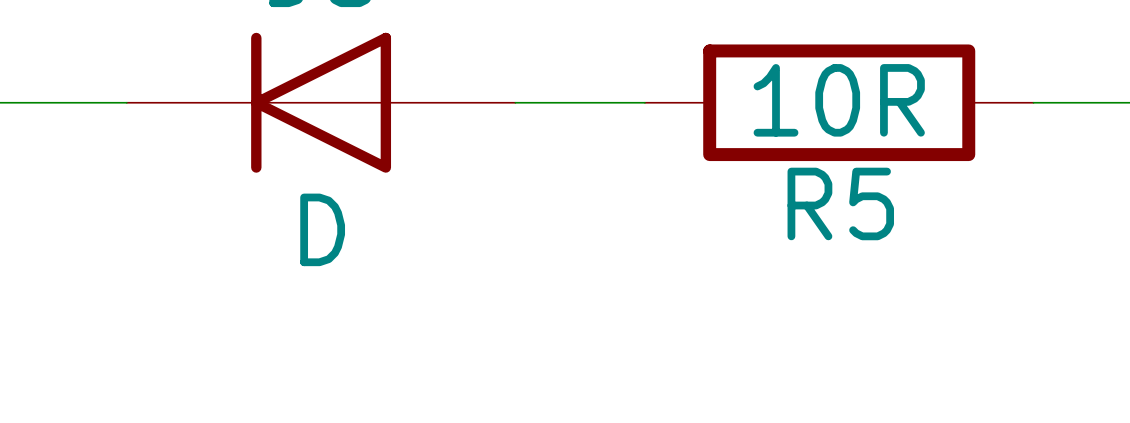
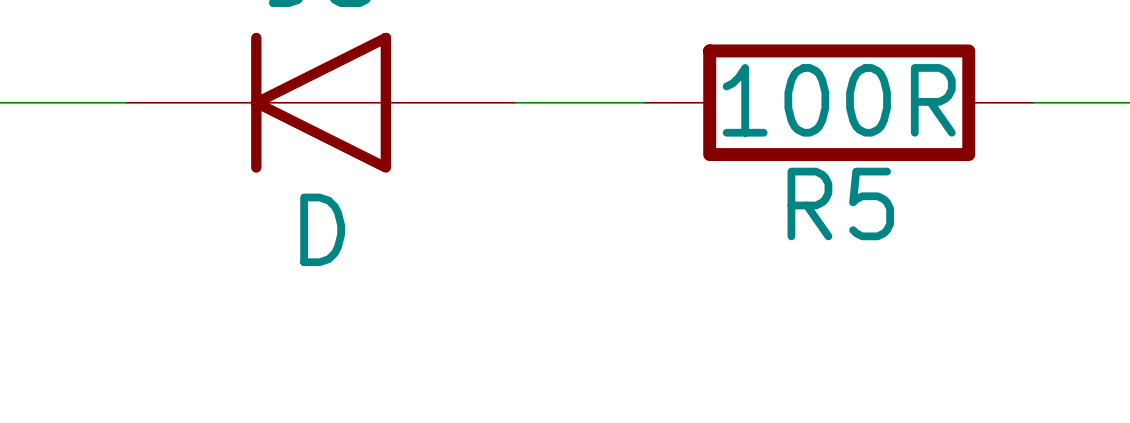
R5 value: 10R (839, 100) -> 100R (839, 100)

